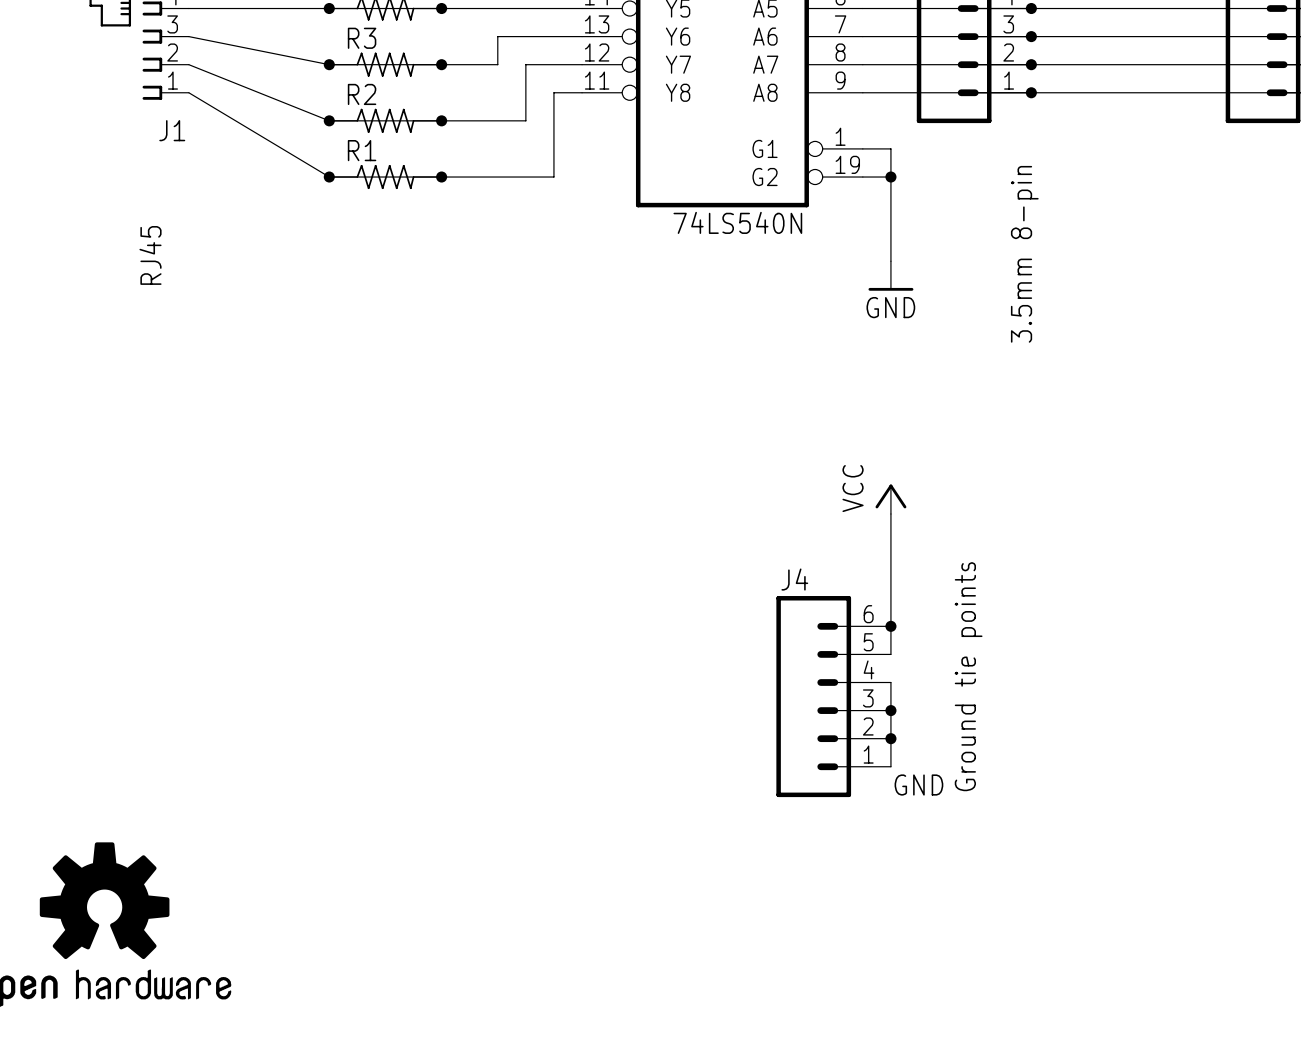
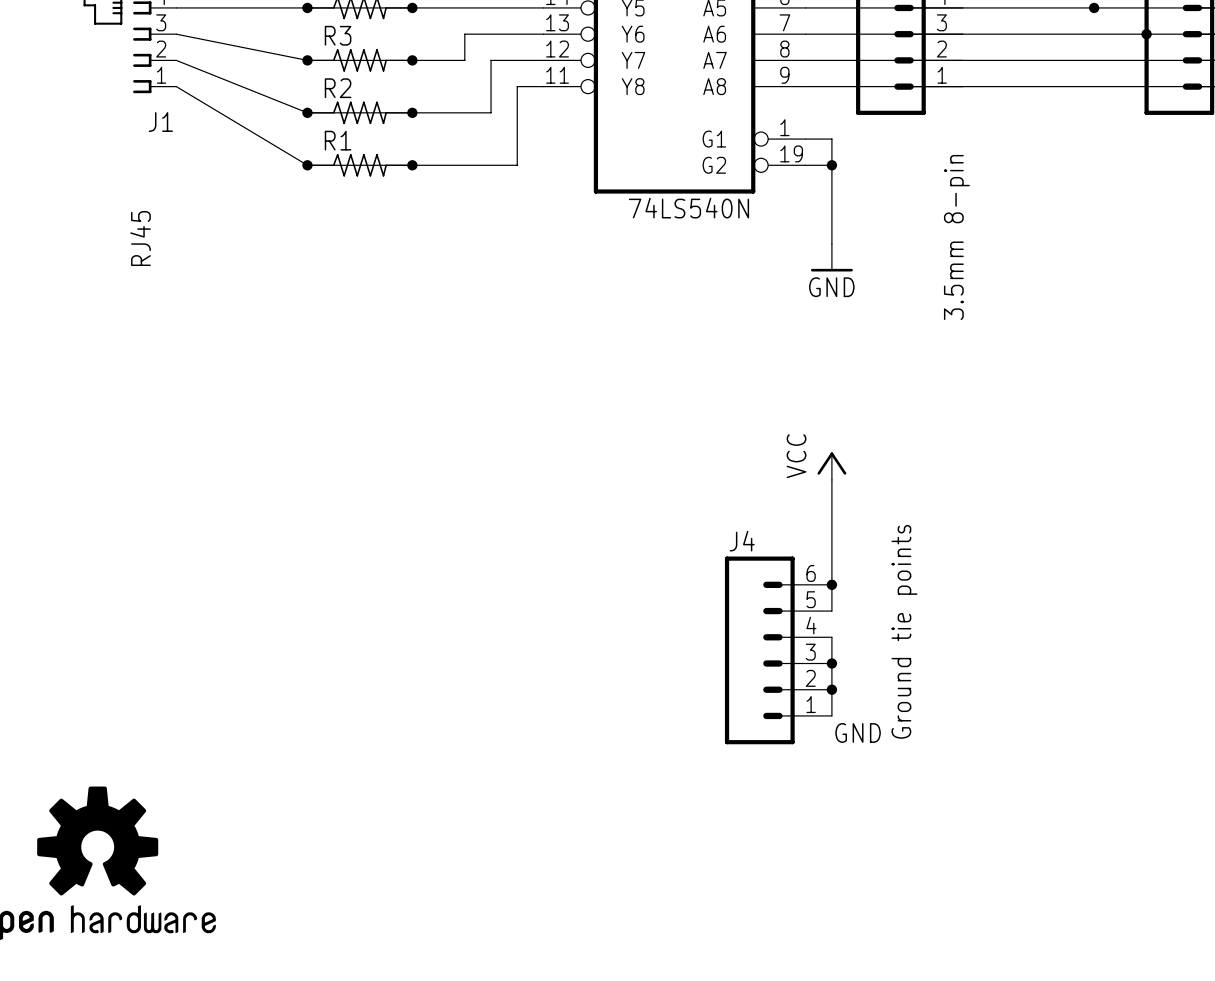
junction: (1031, 8) -> none
junction: none -> (1094, 7)
junction: (1031, 36) -> none
junction: none -> (1146, 34)
junction: (1031, 64) -> none
junction: (1031, 92) -> none

